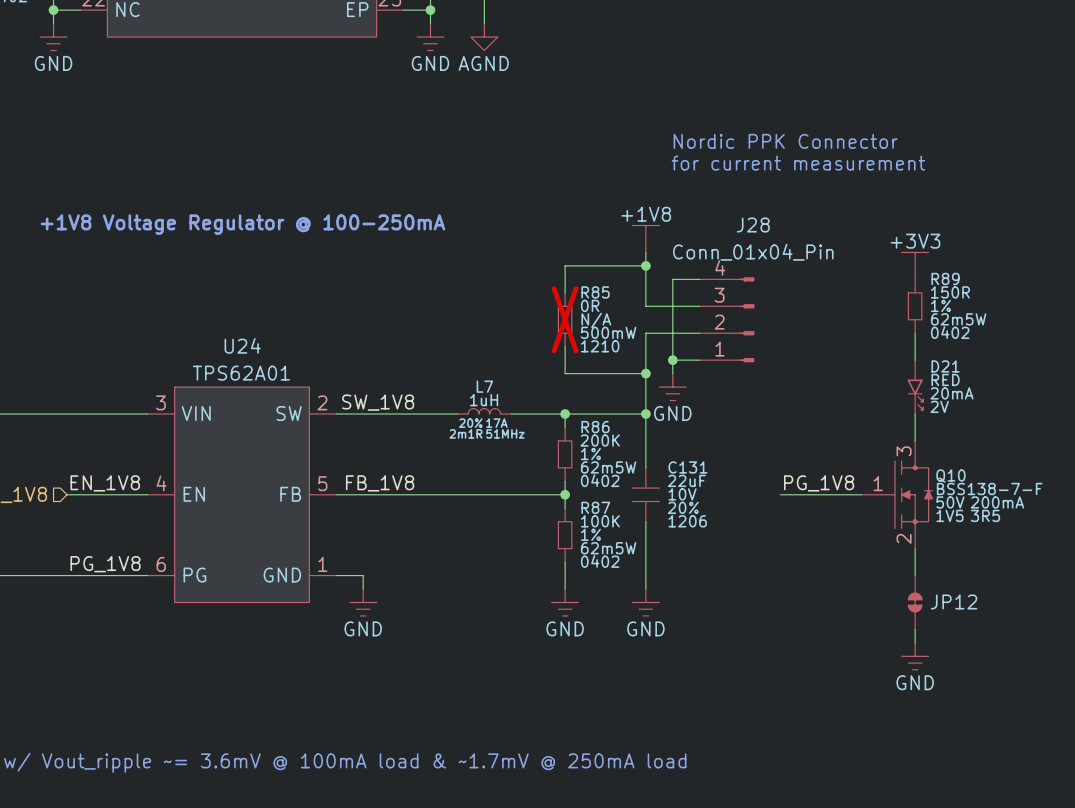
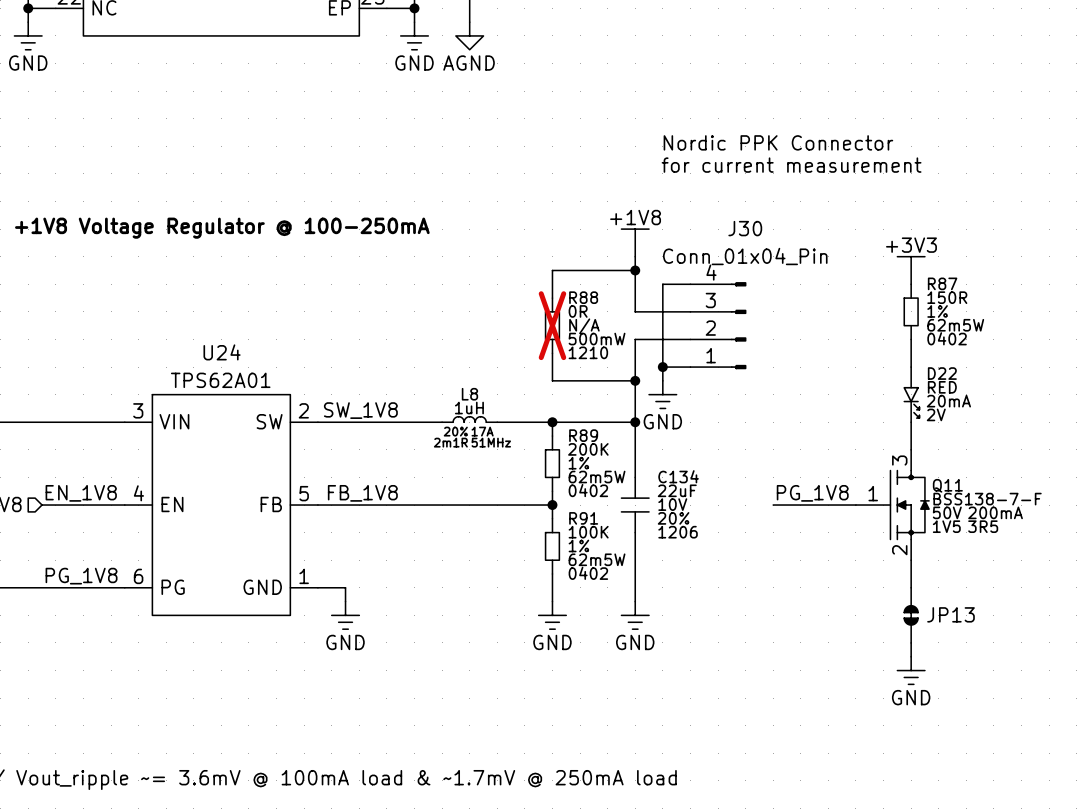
J28 name: J28 (753, 225) -> J30 (745, 228)
R89 name: R89 (945, 278) -> R87 (942, 283)
R85 name: R85 (595, 292) -> R88 (583, 297)
D21 name: D21 (945, 366) -> D22 (942, 373)
L7 name: L7 (484, 386) -> L8 (469, 394)
R86 name: R86 (595, 427) -> R89 (583, 435)
C131 name: C131 (687, 467) -> C134 (678, 476)
Q10 name: Q10 (950, 476) -> Q11 (947, 485)
R87 name: R87 (595, 507) -> R91 (583, 518)
JP12 name: JP12 (954, 601) -> JP13 (951, 614)

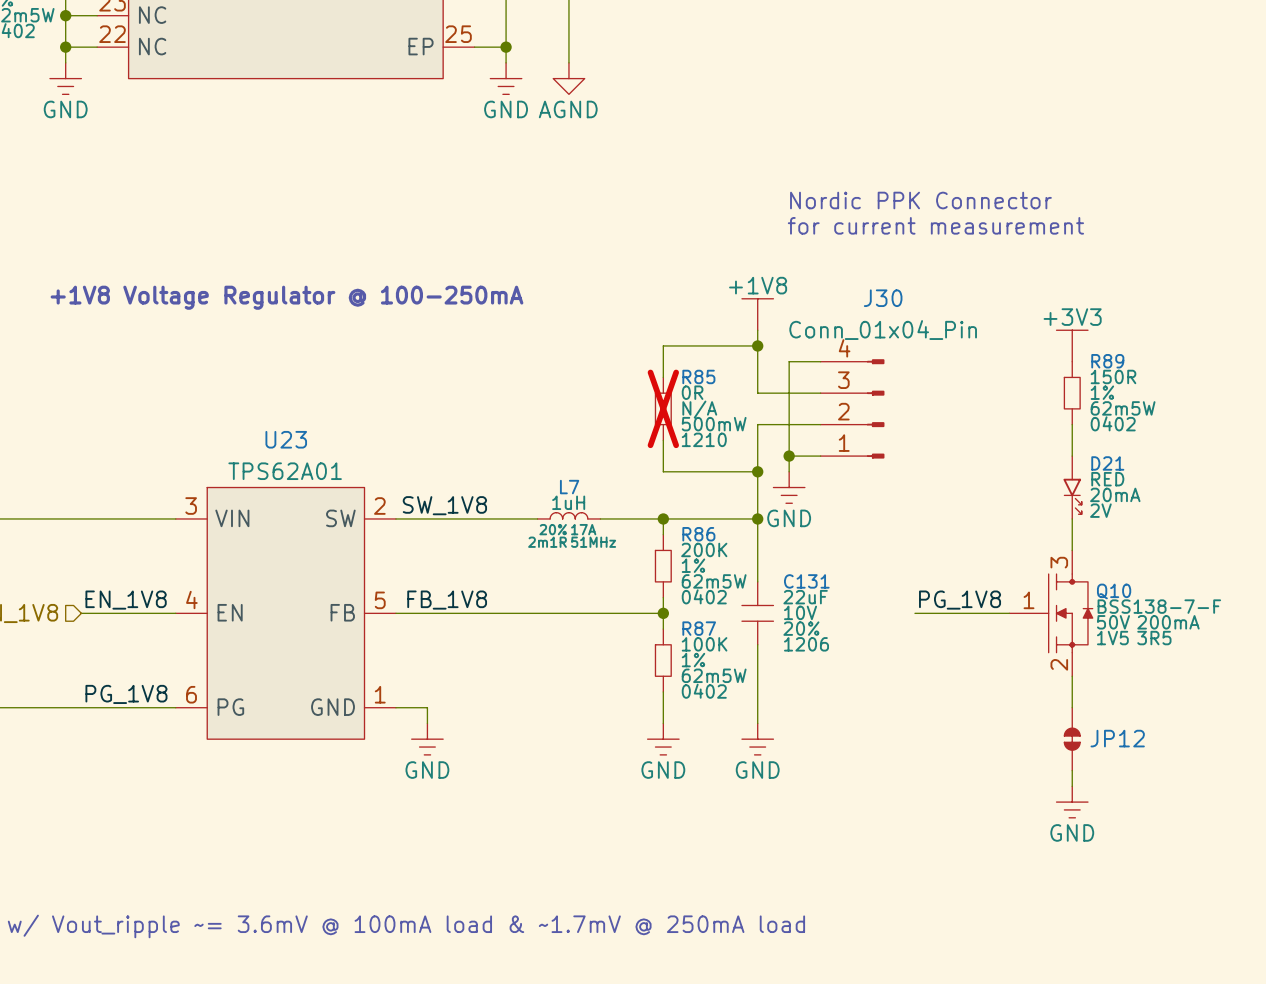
R87 name: R87 (942, 283) -> R89 (1107, 361)
R88 name: R88 (583, 297) -> R85 (698, 376)
U24 name: U24 (222, 352) -> U23 (286, 439)
D22 name: D22 (942, 373) -> D21 (1107, 463)
L8 name: L8 (469, 394) -> L7 (569, 487)
R89 name: R89 (583, 435) -> R86 (698, 534)
C134 name: C134 (678, 476) -> C131 (806, 581)
Q11 name: Q11 (947, 485) -> Q10 (1114, 591)
R91 name: R91 (583, 518) -> R87 (699, 628)
JP13 name: JP13 (951, 614) -> JP12 (1117, 738)

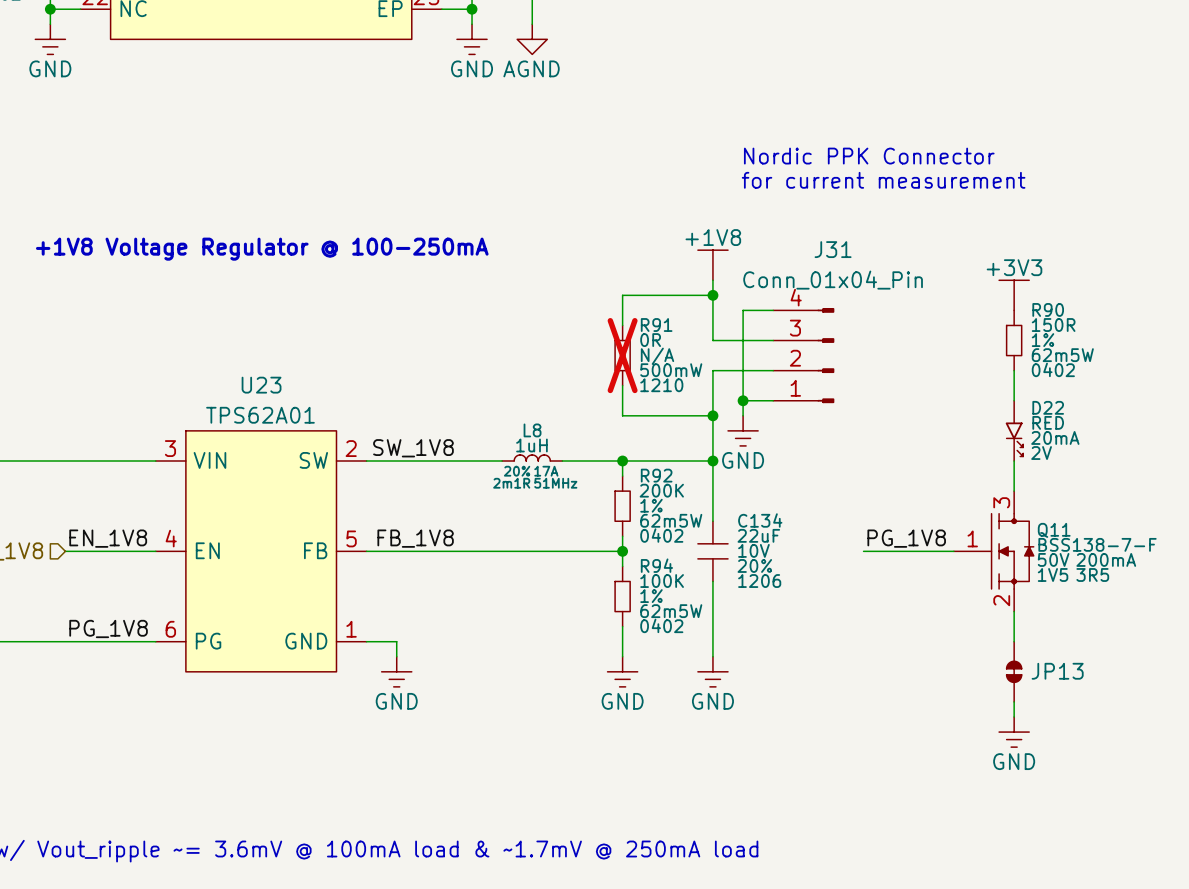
J30 name: J30 (883, 298) -> J31 (833, 249)
R89 name: R89 (1107, 361) -> R90 (1048, 309)
R85 name: R85 (698, 376) -> R91 (656, 325)
D21 name: D21 (1107, 463) -> D22 (1048, 407)
L7 name: L7 (569, 487) -> L8 (532, 430)
R86 name: R86 (698, 534) -> R92 (656, 475)
C131 name: C131 (806, 581) -> C134 (760, 520)
Q10 name: Q10 (1114, 591) -> Q11 (1054, 530)
R87 name: R87 (699, 628) -> R94 (656, 565)
JP12 name: JP12 (1117, 738) -> JP13 (1057, 671)

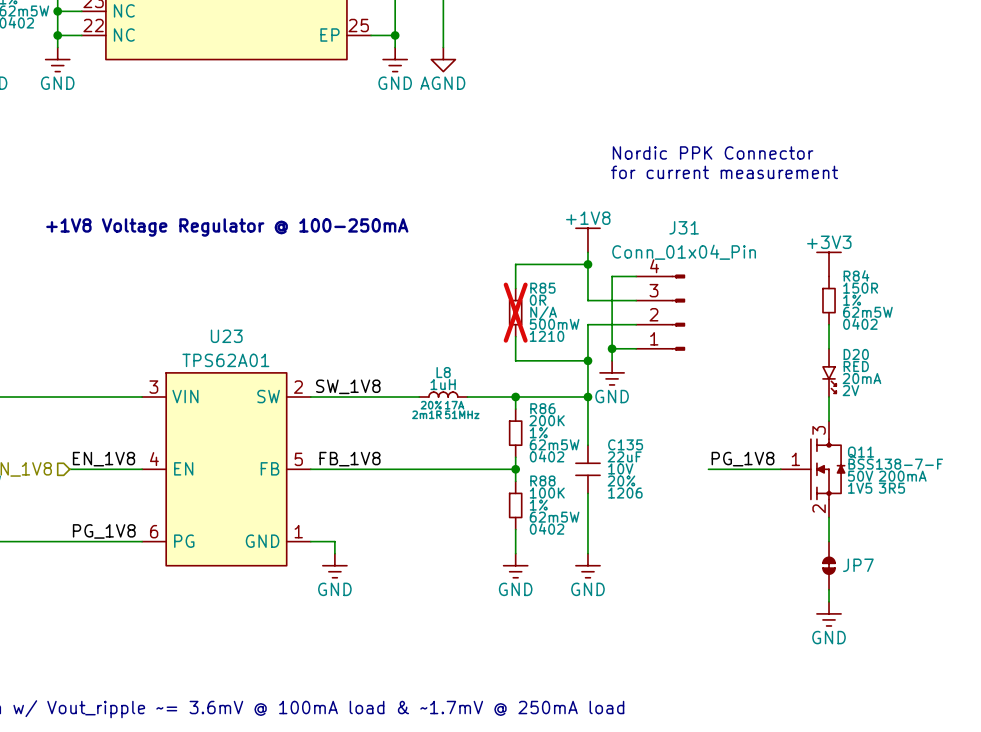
R90 name: R90 (1048, 309) -> R84 (856, 275)
R91 name: R91 (656, 325) -> R85 (542, 288)
D22 name: D22 (1048, 407) -> D20 (856, 354)
R92 name: R92 (656, 475) -> R86 (542, 408)
C134 name: C134 (760, 520) -> C135 (625, 444)
R94 name: R94 (656, 565) -> R88 (542, 481)
JP13 name: JP13 (1057, 671) -> JP7 (858, 565)

